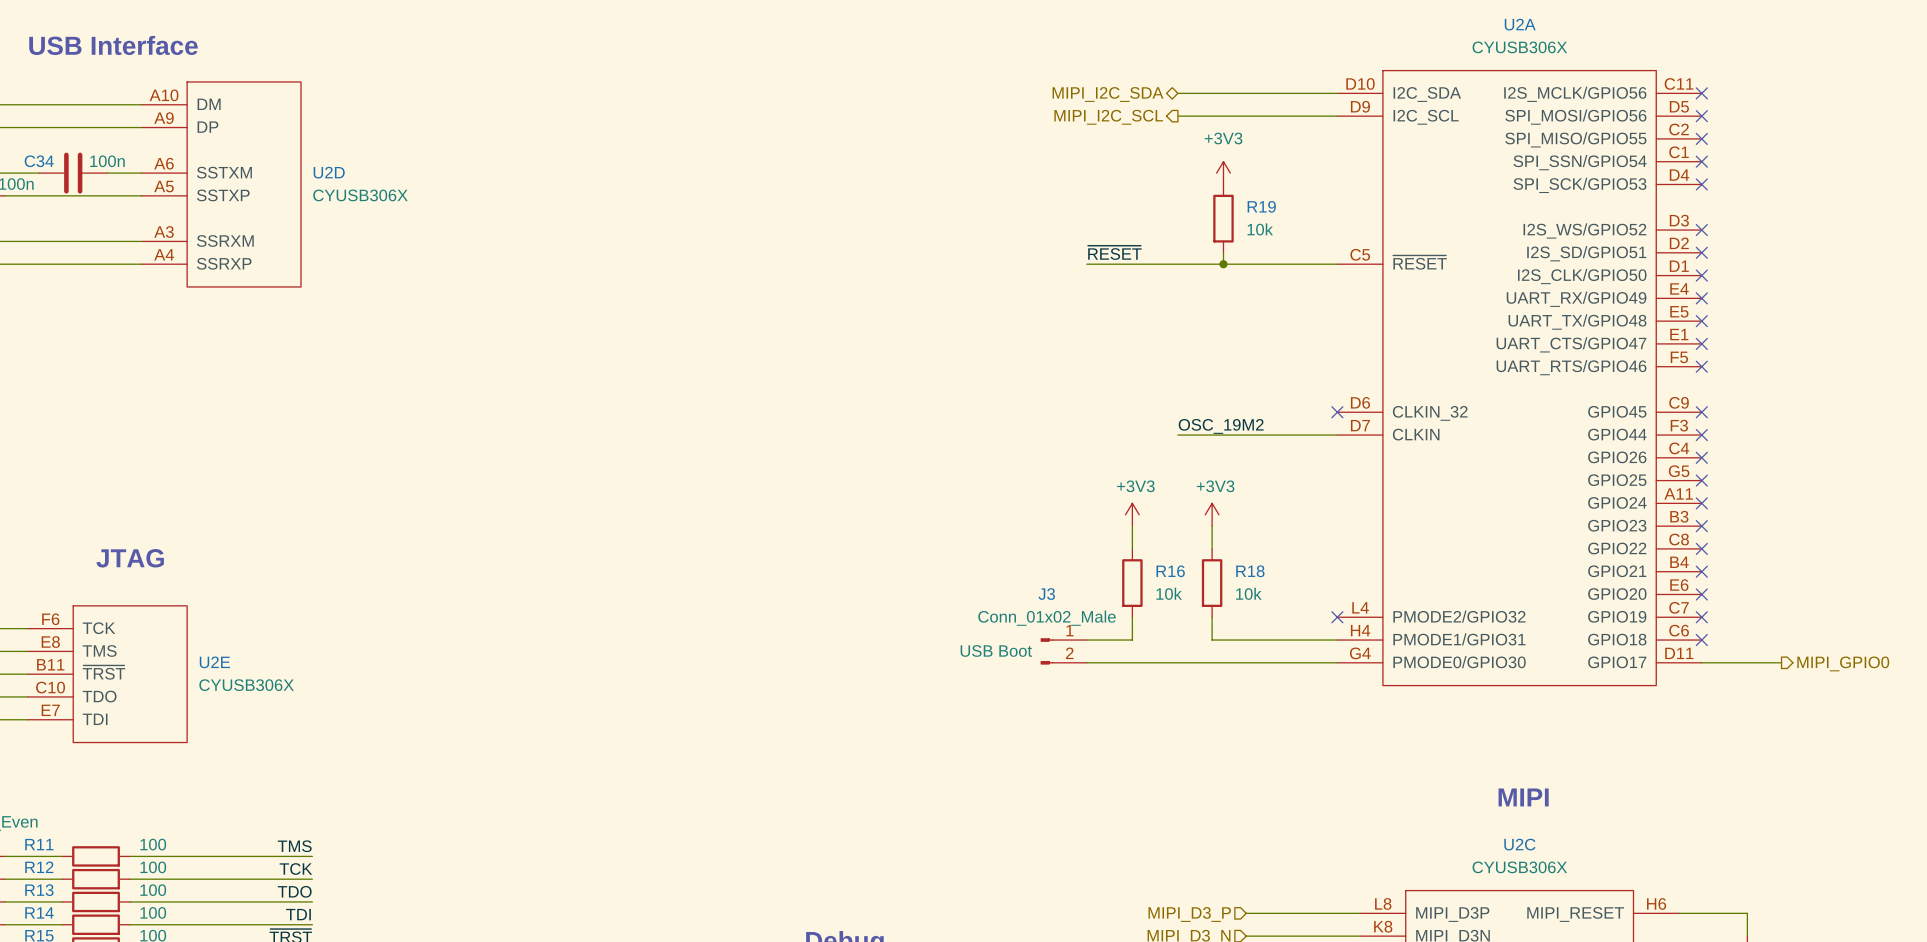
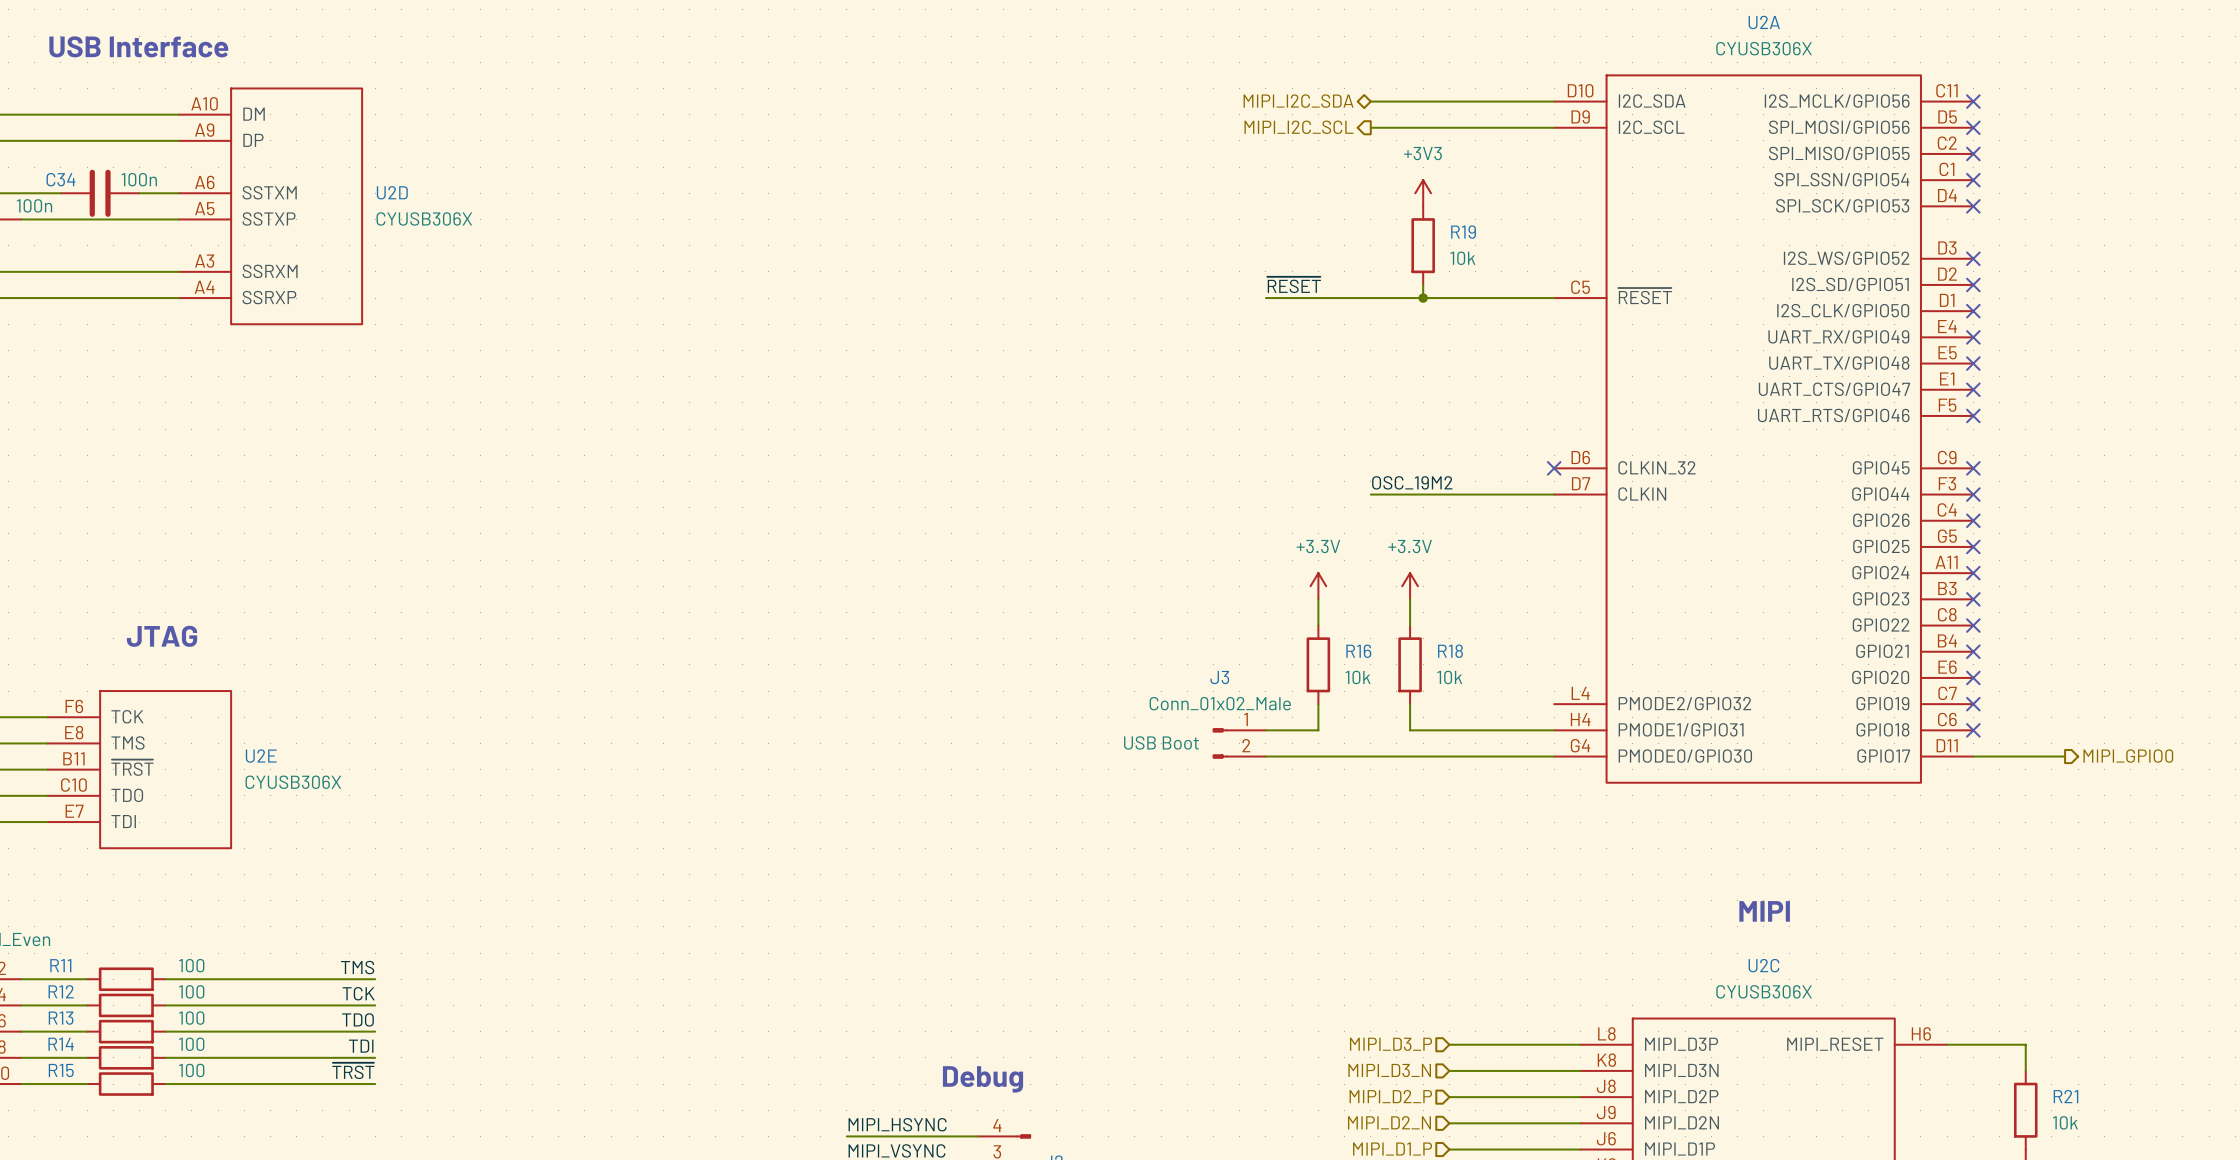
power symbol: +3V3 (1132, 514) -> +3.3V (1318, 586)
power symbol: +3V3 (1212, 514) -> +3.3V (1410, 586)
no-connect mark: (1337, 617) -> none

